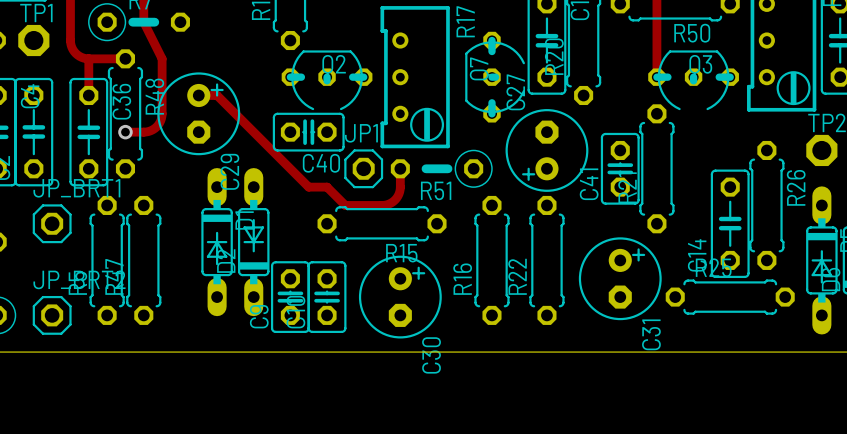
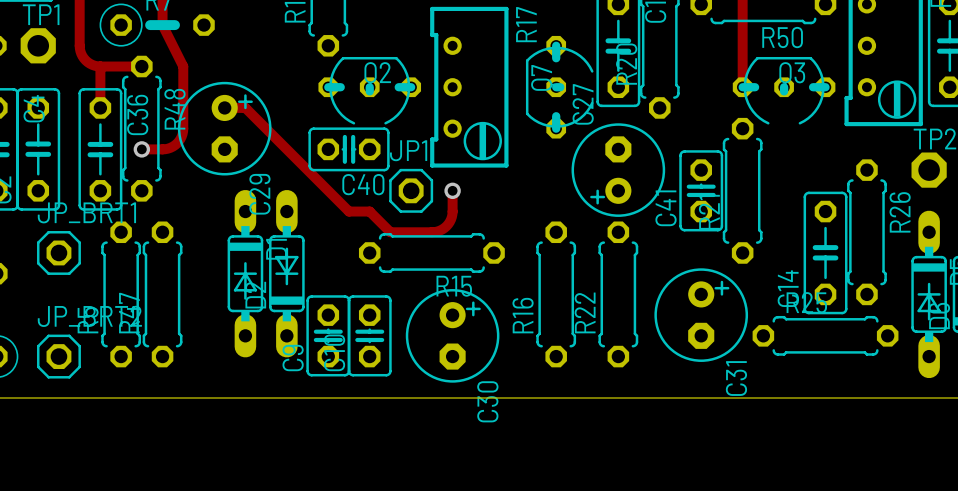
via: none -> (452, 190)
R51: (441, 168) -> none

